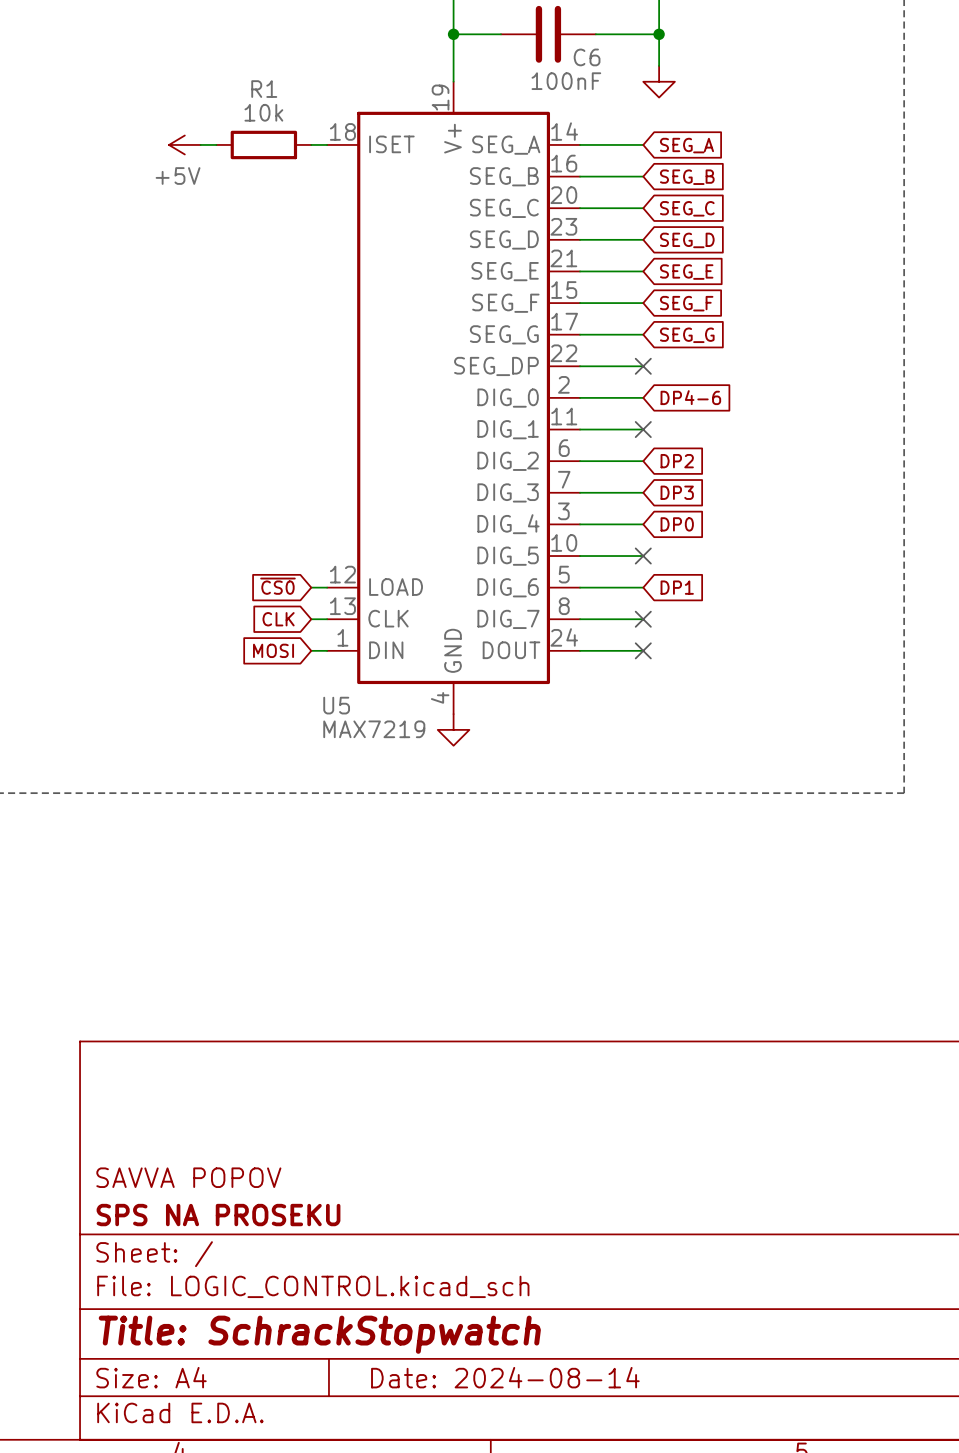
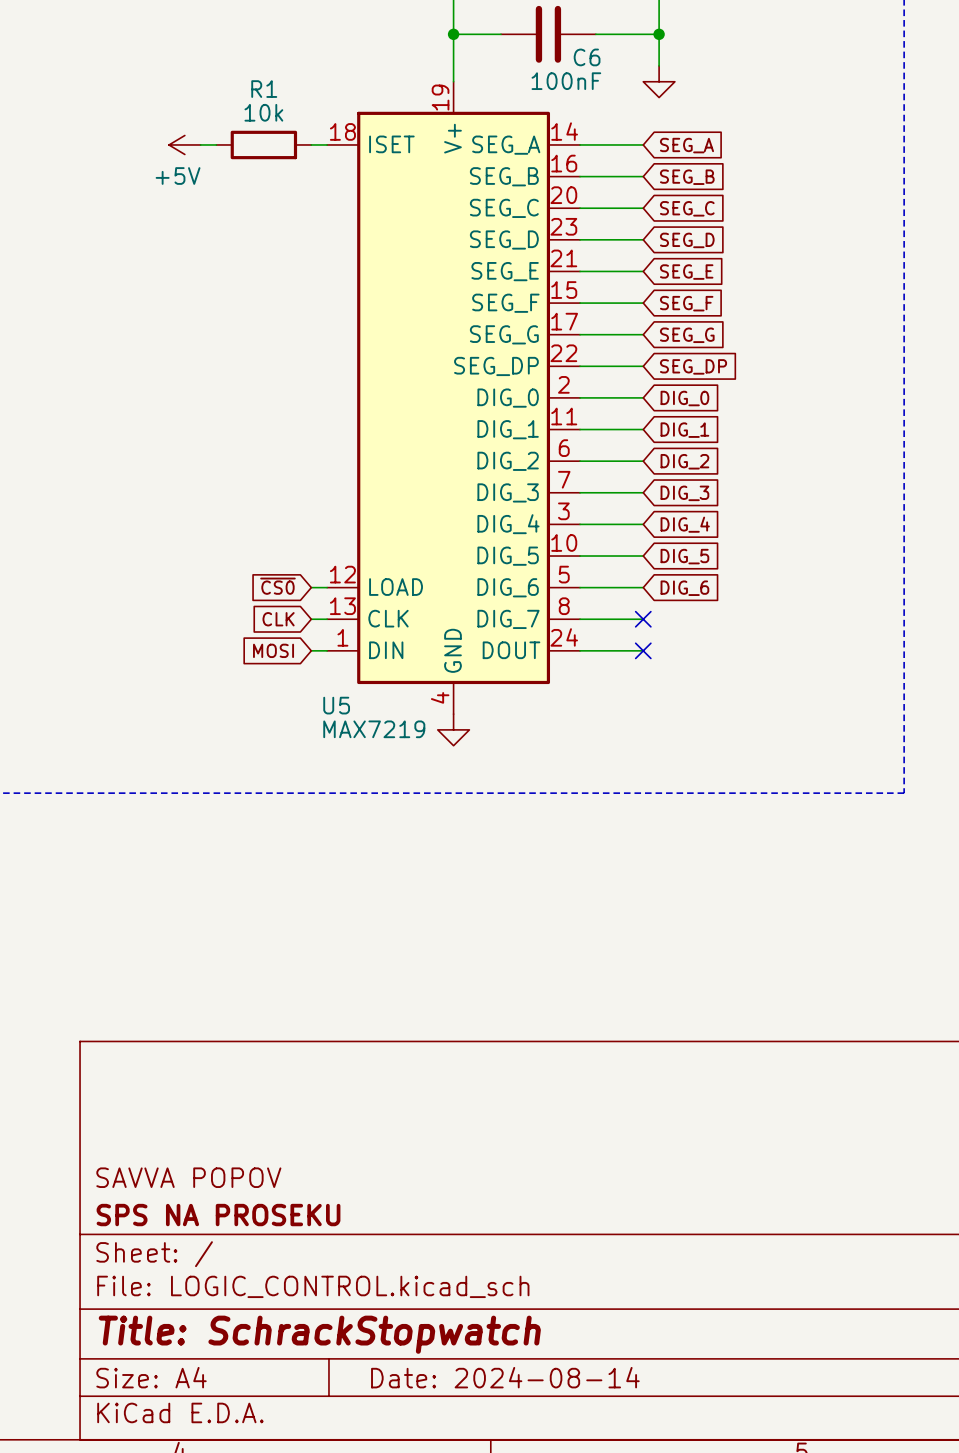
no-connect mark: (643, 366) -> none
global label: none -> SEG_DP (693, 366)
global label: DP4-6 (690, 397) -> DIG_0 (684, 398)
no-connect mark: (643, 429) -> none
global label: none -> DIG_1 (684, 430)
global label: DP2 (677, 461) -> DIG_2 (684, 461)
global label: DP3 (677, 492) -> DIG_3 (684, 493)
global label: DP0 (677, 524) -> DIG_4 (685, 524)
no-connect mark: (643, 556) -> none
global label: none -> DIG_5 (684, 556)
global label: DP1 (677, 587) -> DIG_6 (684, 588)

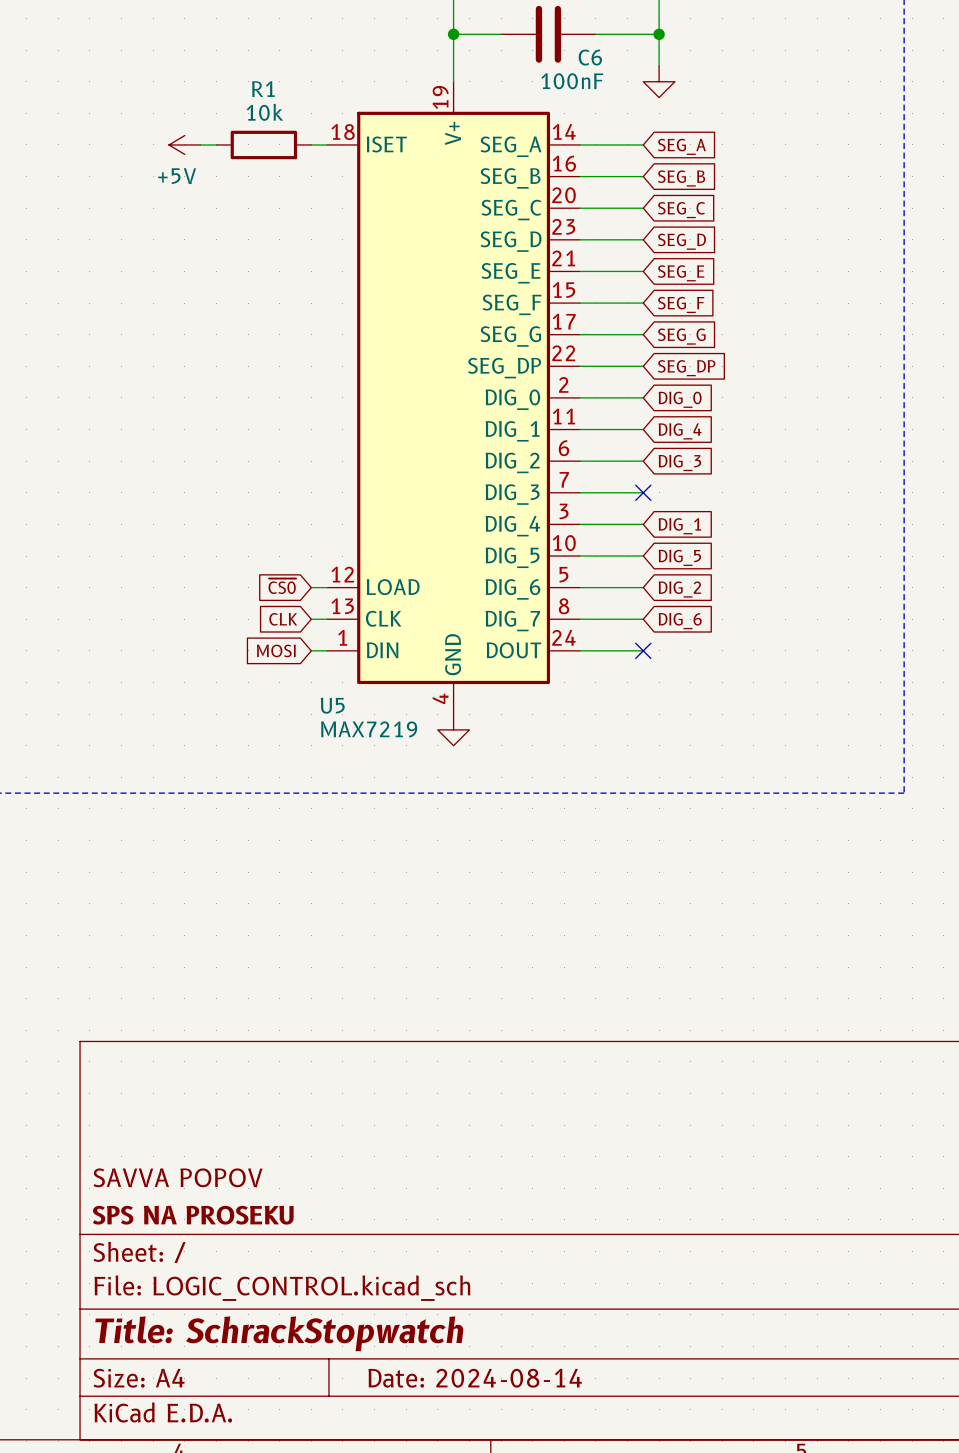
global label: DIG_1 (684, 430) -> DIG_4 (680, 431)
global label: DIG_2 (684, 461) -> DIG_3 (679, 463)
no-connect mark: none -> (643, 492)
global label: DIG_3 (684, 493) -> none
global label: DIG_4 (685, 524) -> DIG_1 (679, 526)
global label: DIG_6 (684, 588) -> DIG_2 (679, 589)
no-connect mark: (643, 619) -> none
global label: none -> DIG_6 (680, 621)

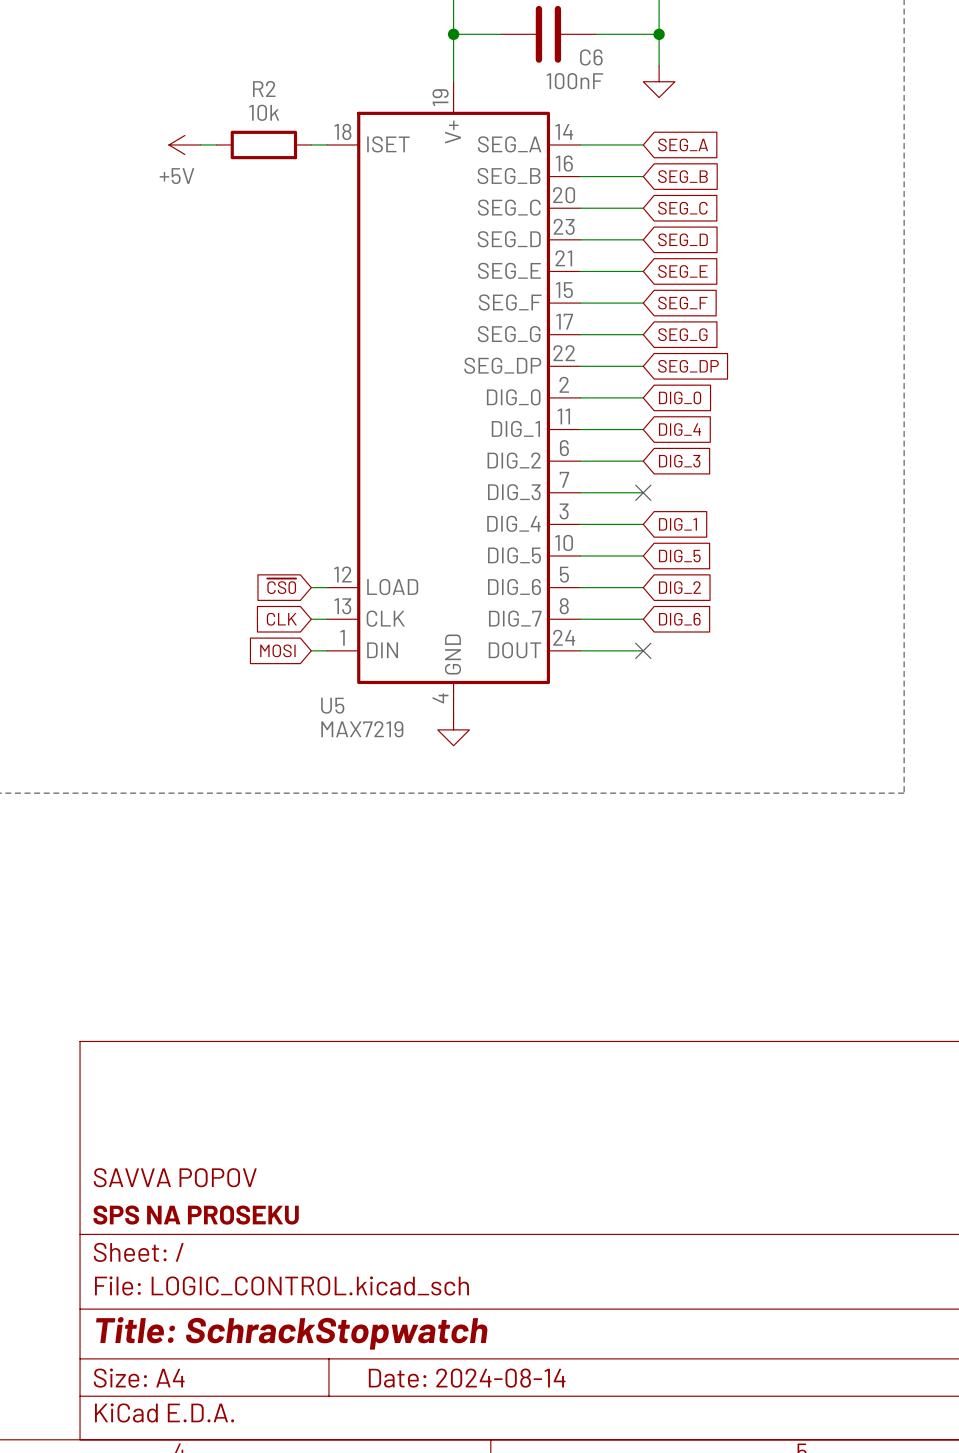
R1 name: R1 (263, 89) -> R2 (264, 88)

